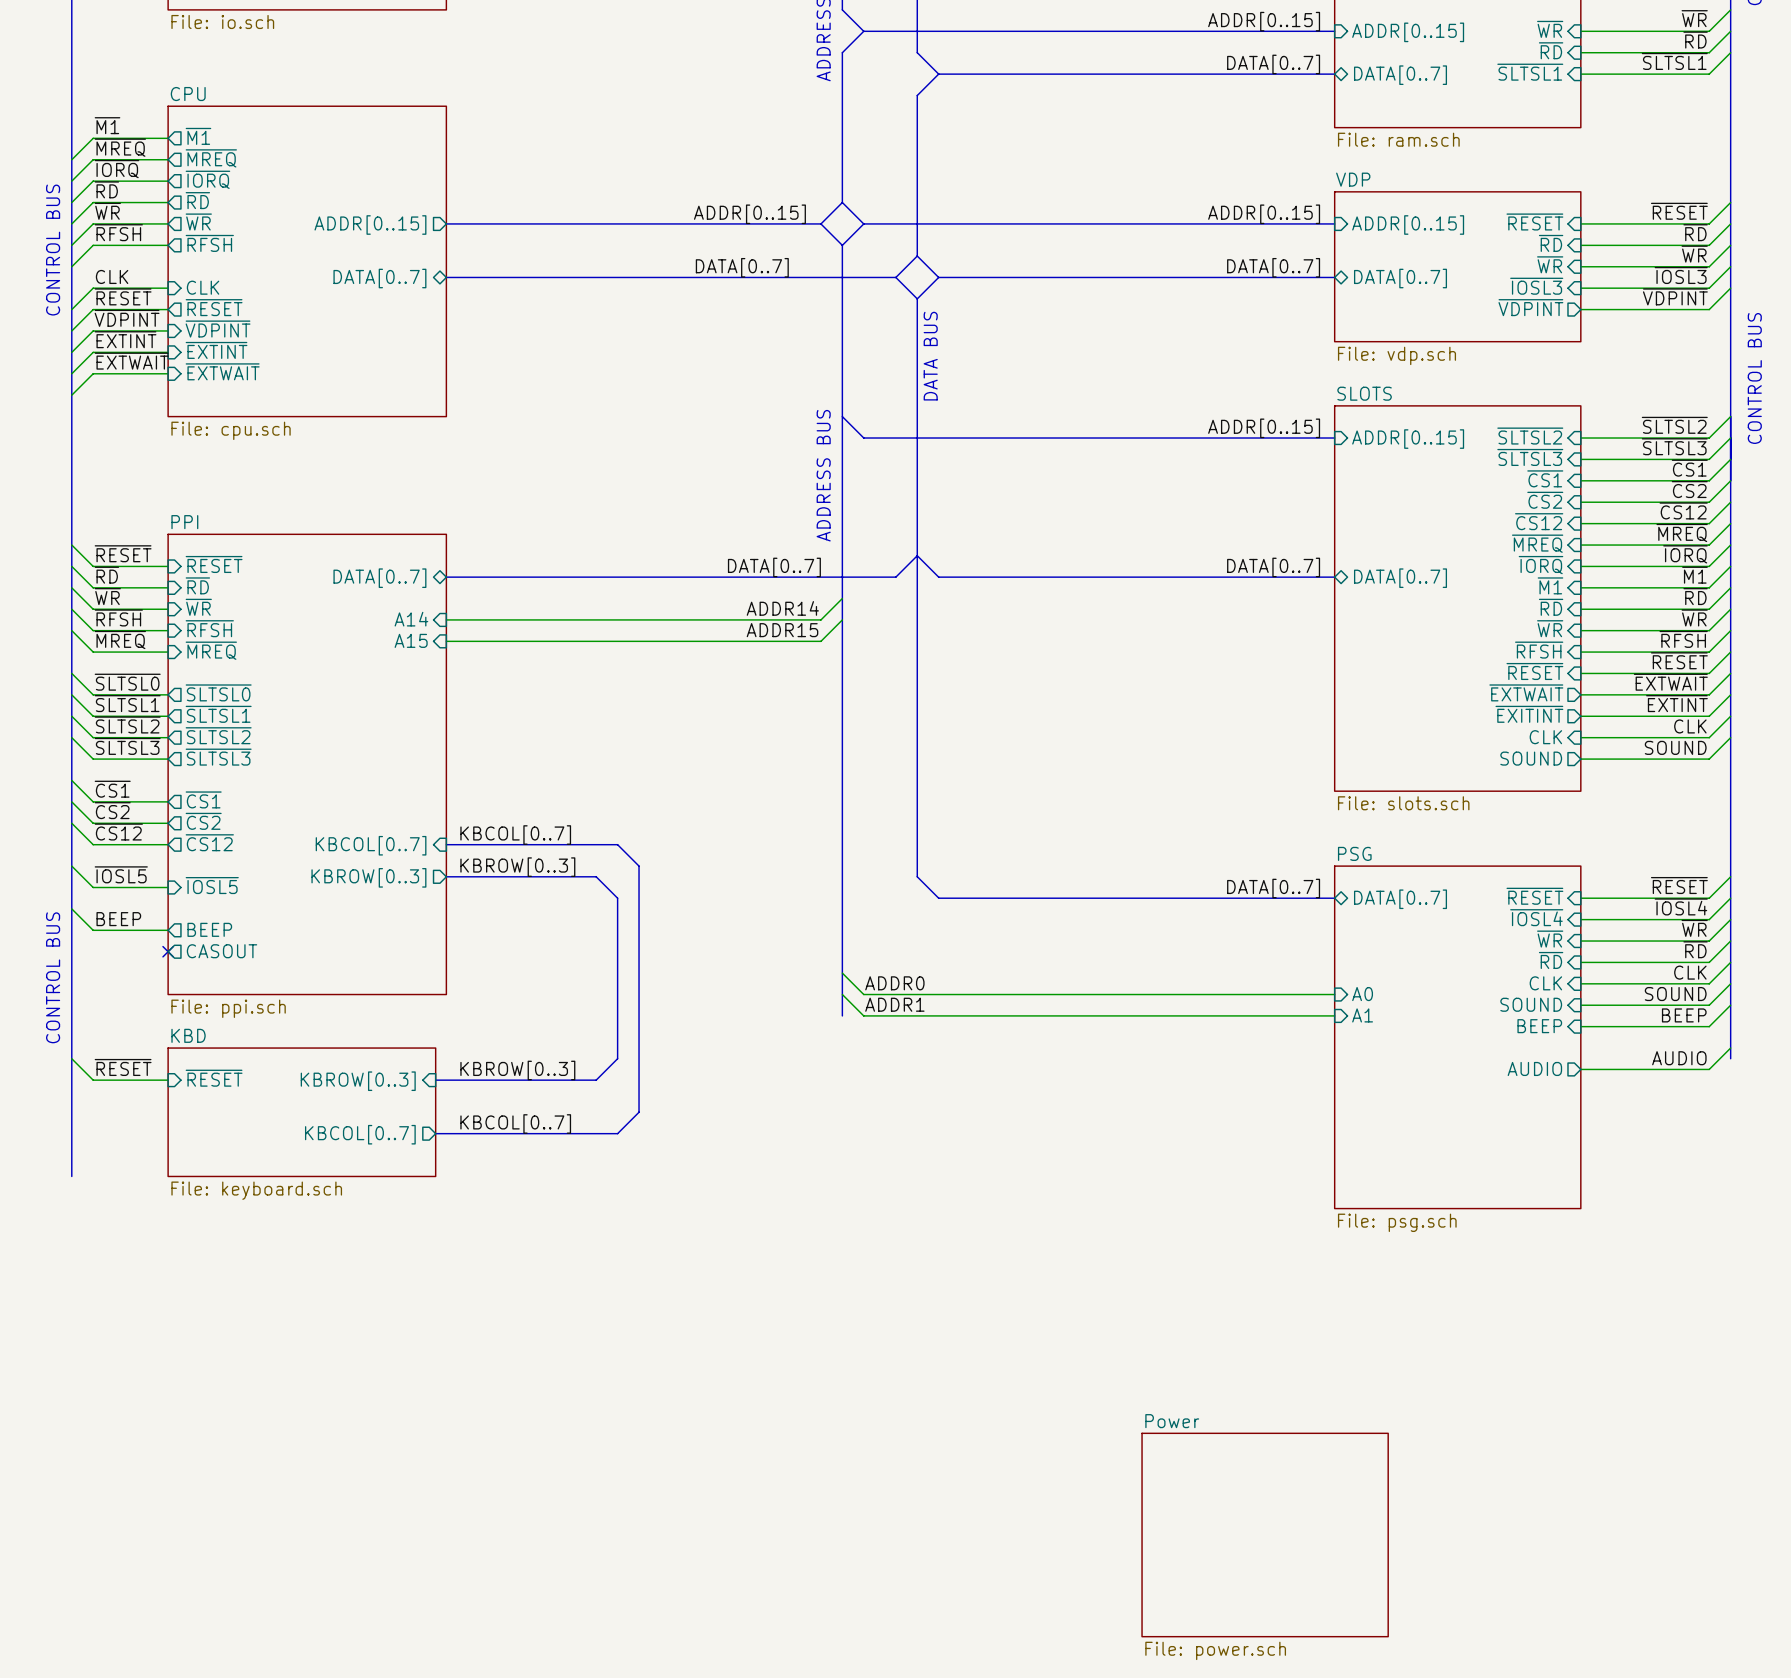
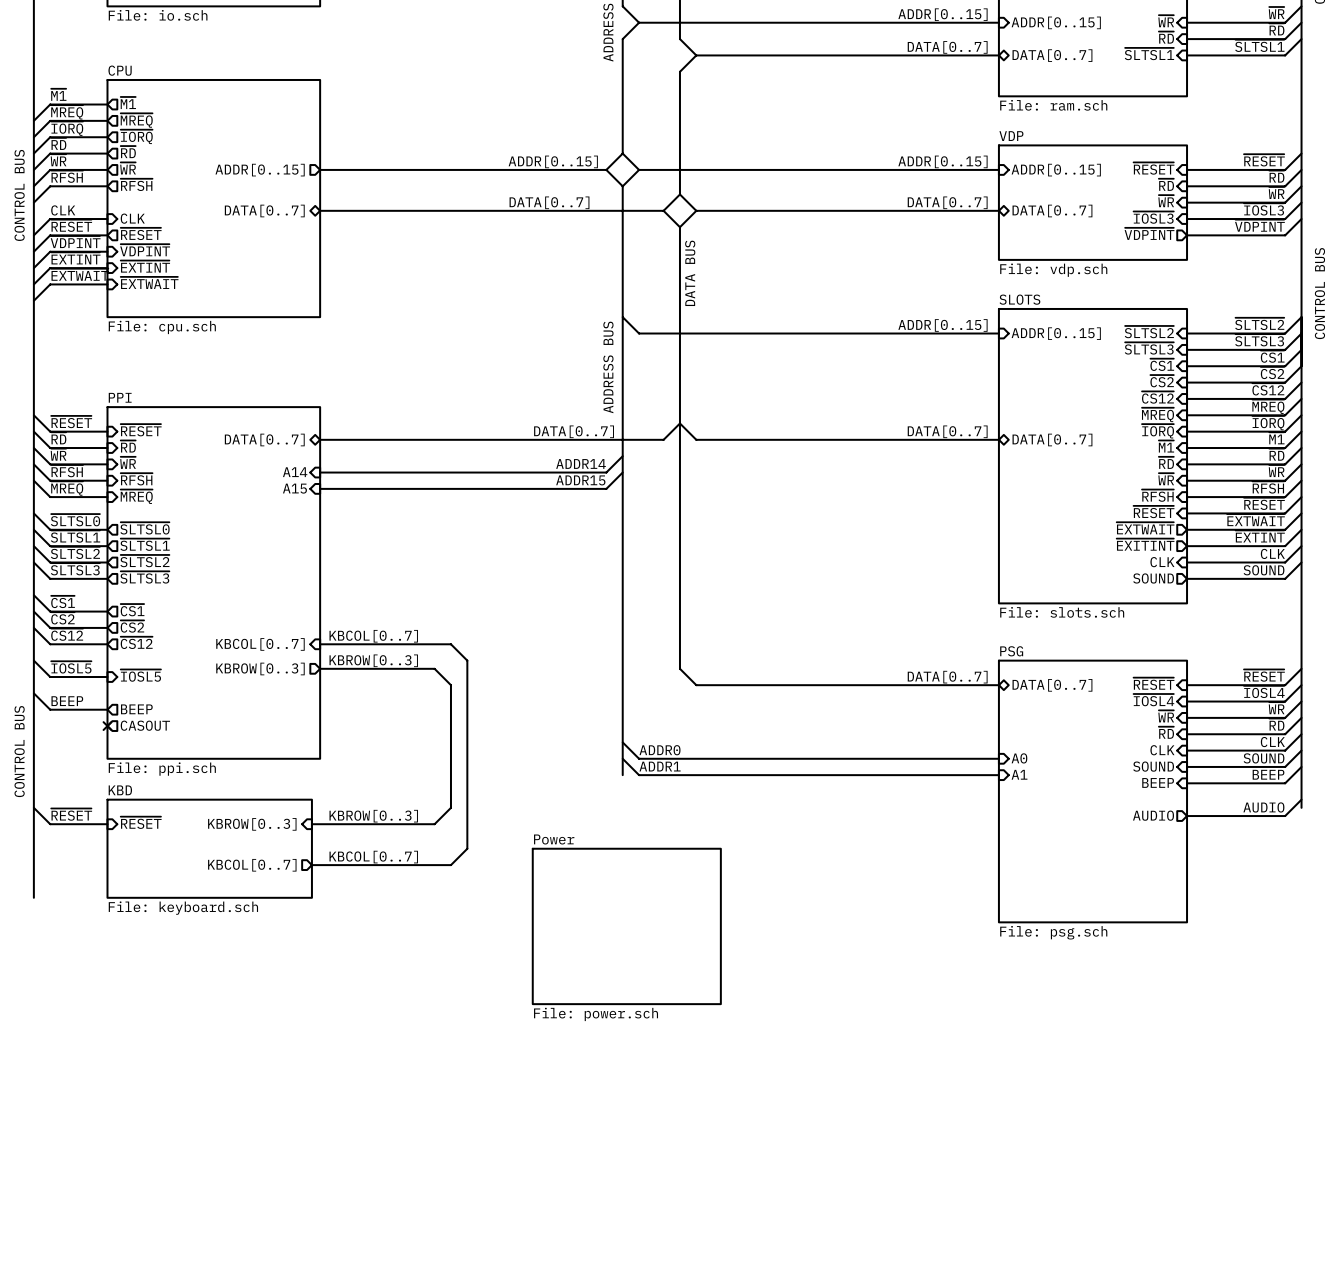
sheet Power: none -> File: power.sch (626, 926)
sheet Power: File: power.sch (1265, 1535) -> none

